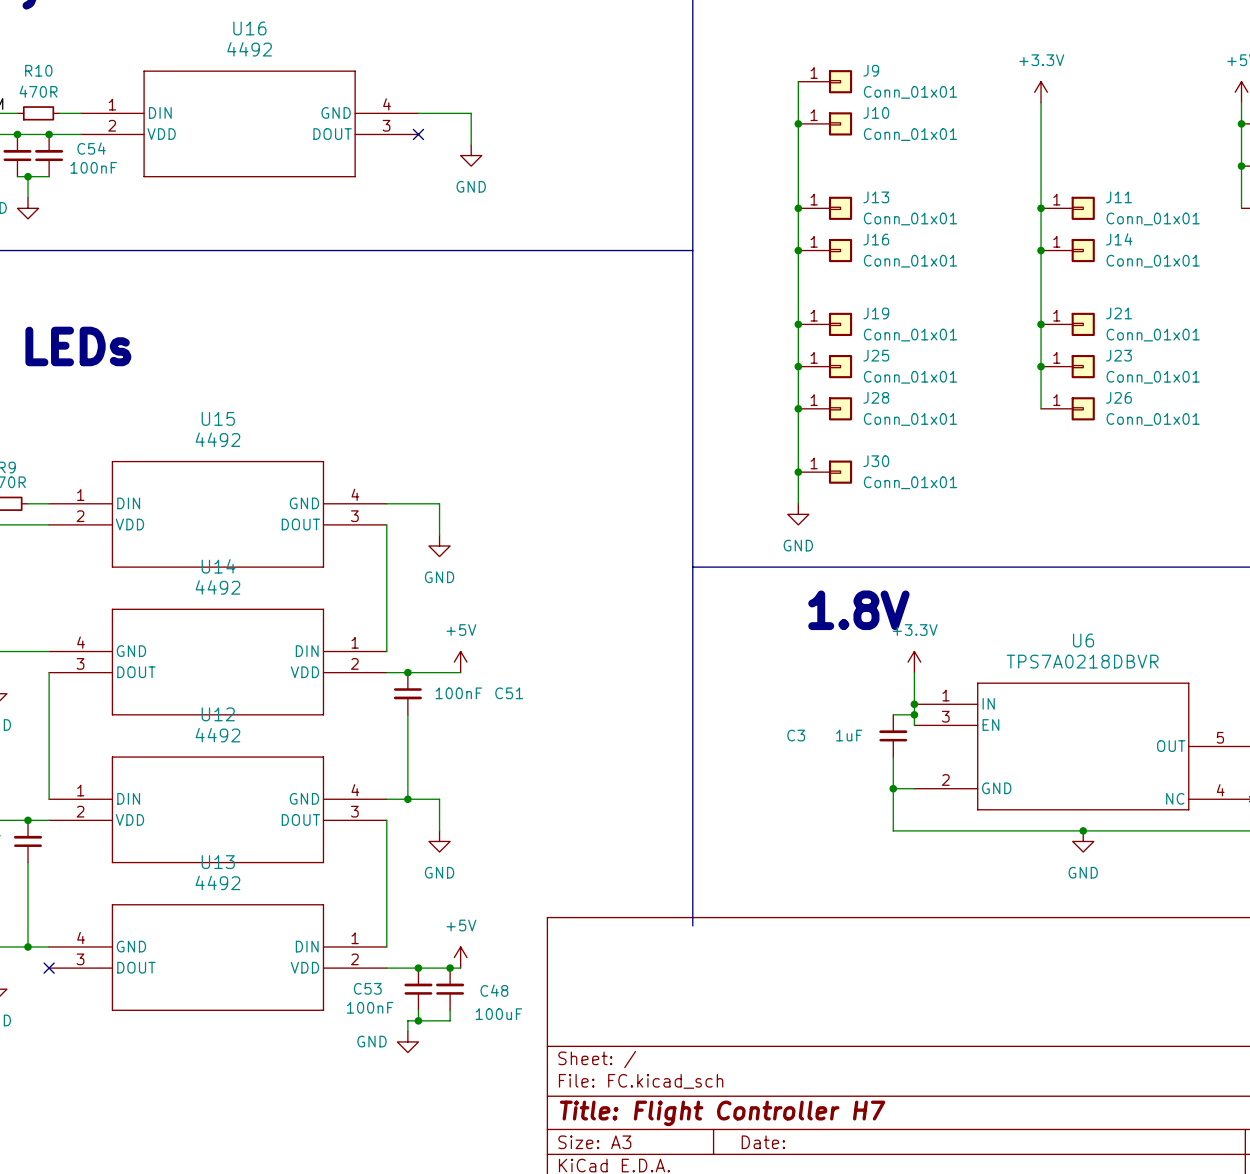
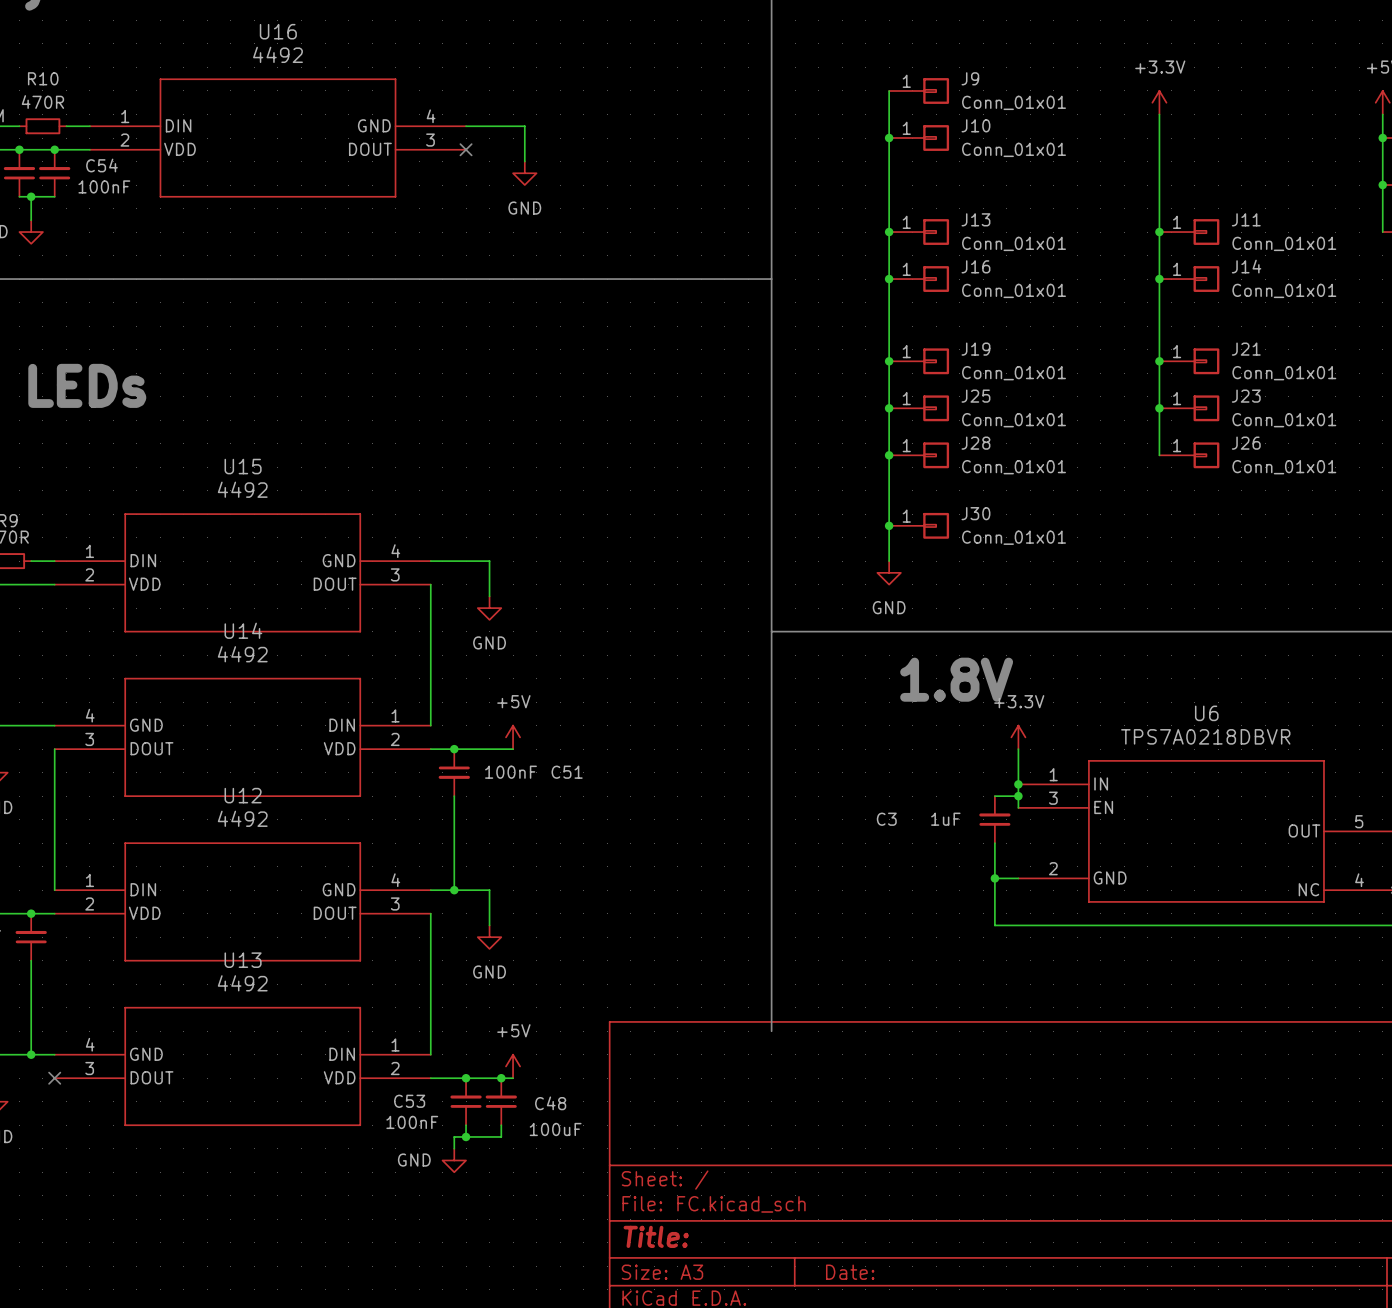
junction: (1083, 830) -> none
power symbol: GND (1083, 841) -> none
title block: Title: Flight Controller H7 (722, 1113) -> Title: (656, 1236)

